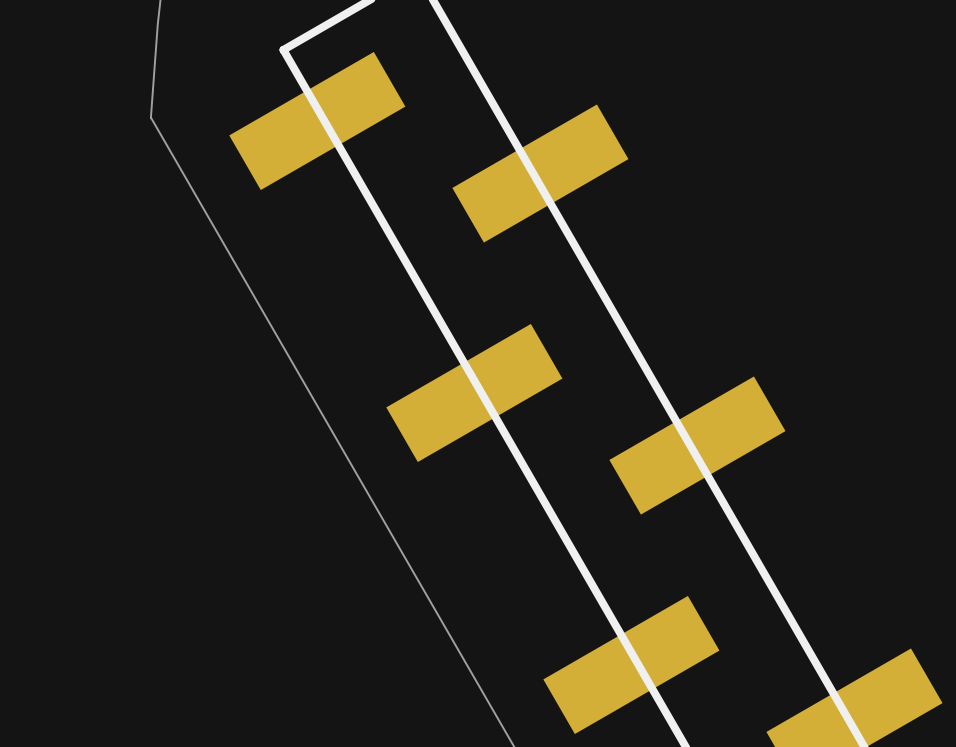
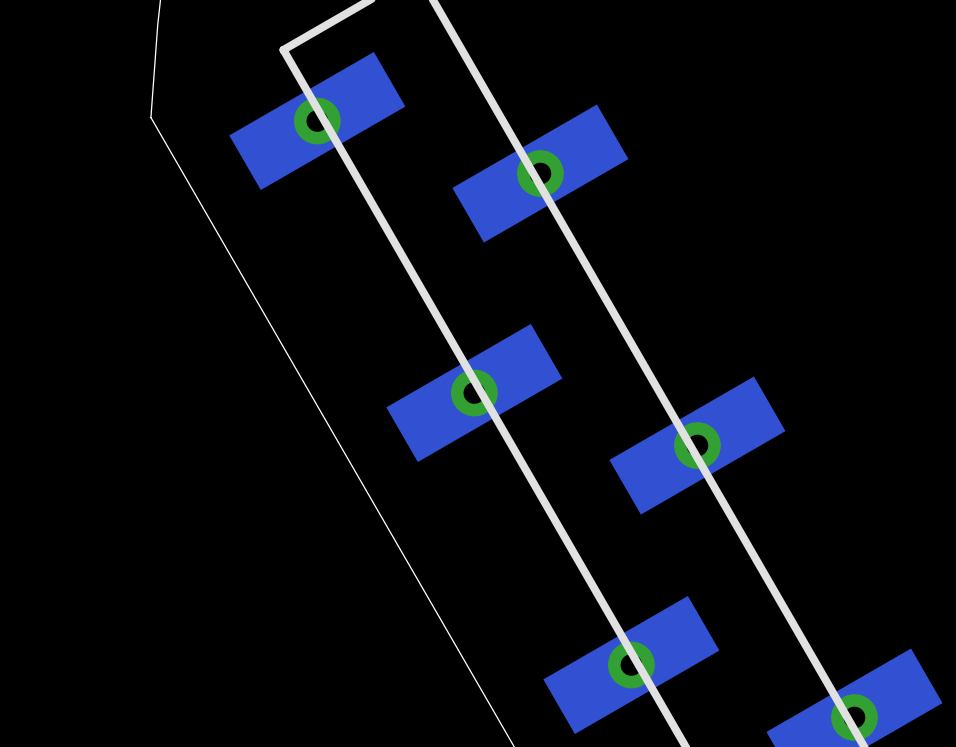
via: none -> (317, 121)
via: none -> (540, 173)
via: none -> (474, 392)
via: none -> (697, 445)
via: none -> (631, 664)
via: none -> (854, 717)

